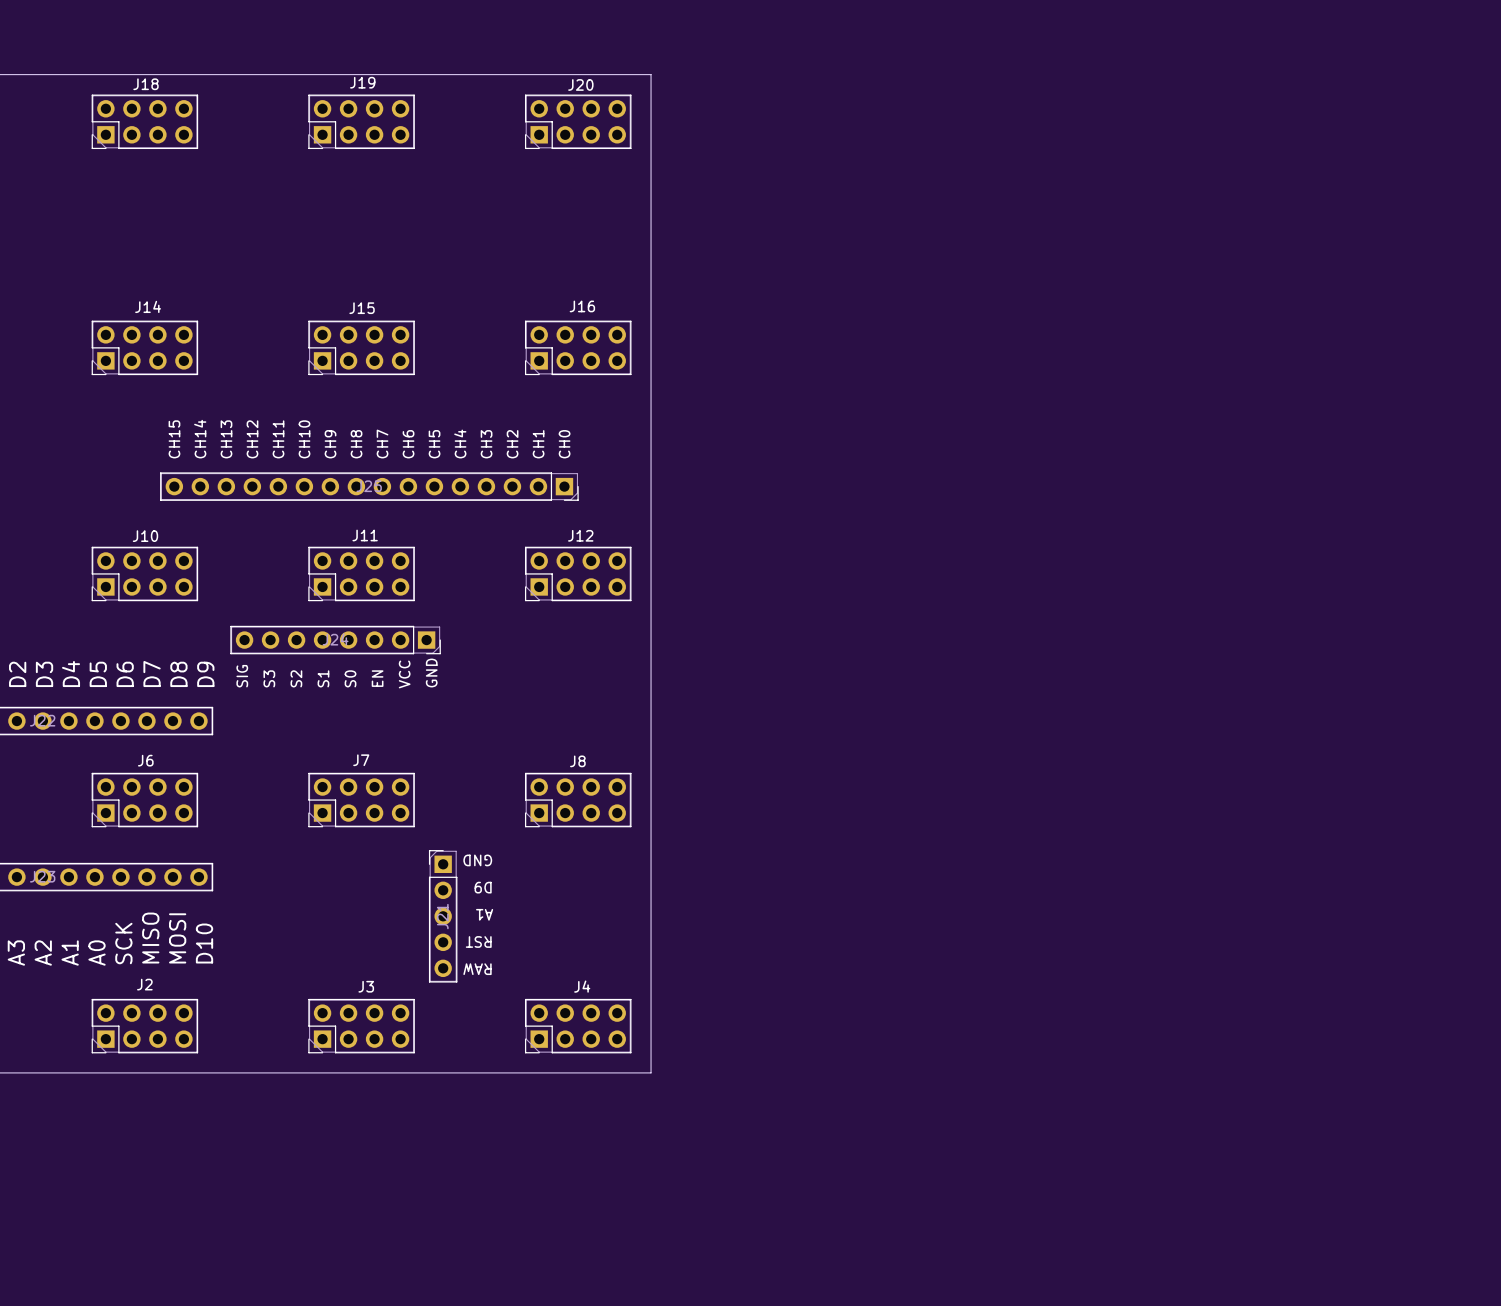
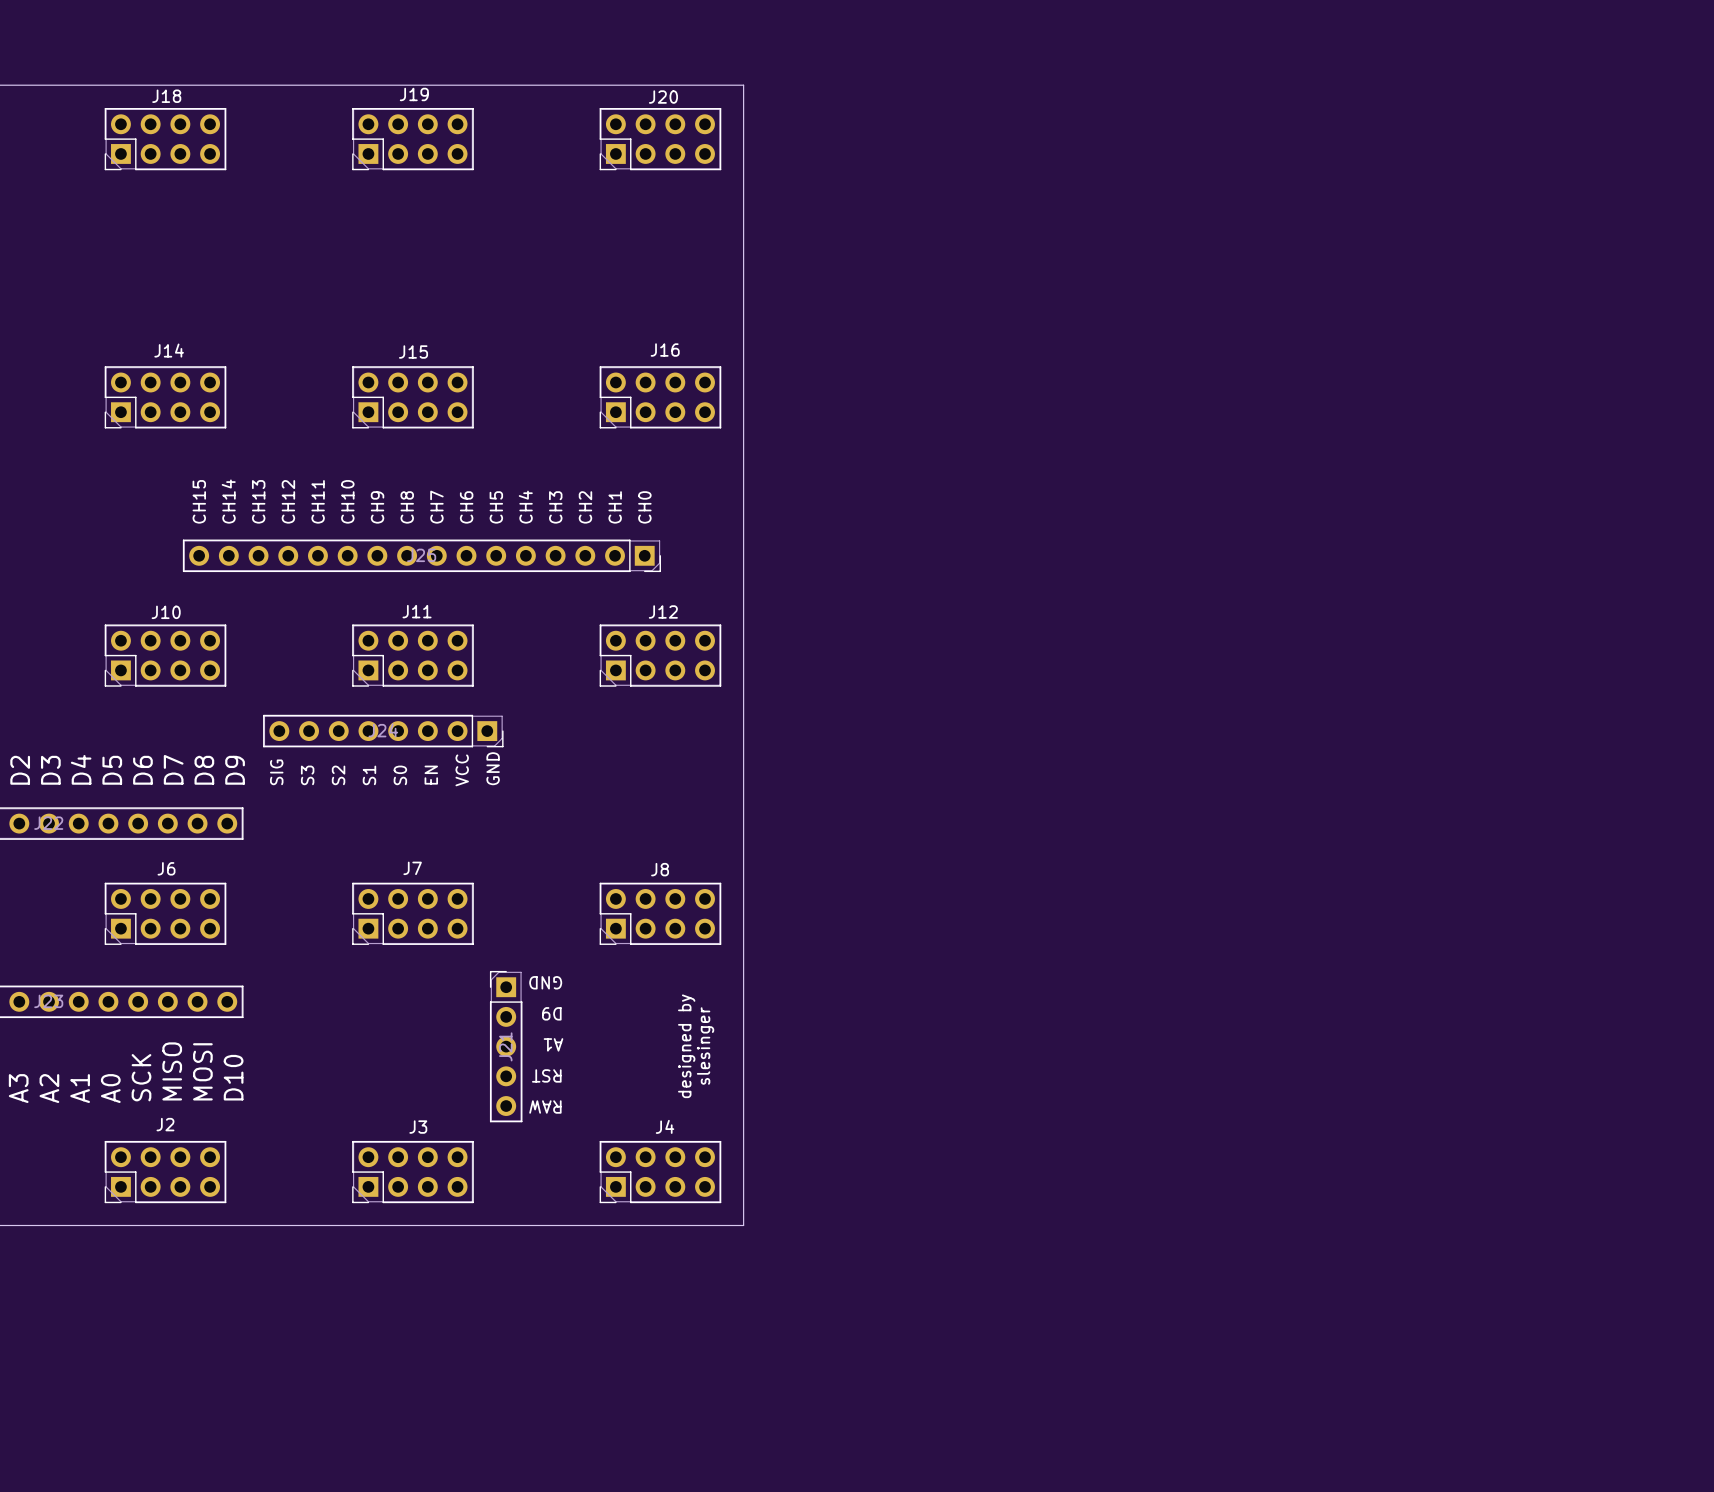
text: none -> slesinger (705, 1046)
text: none -> designed by (686, 1046)

